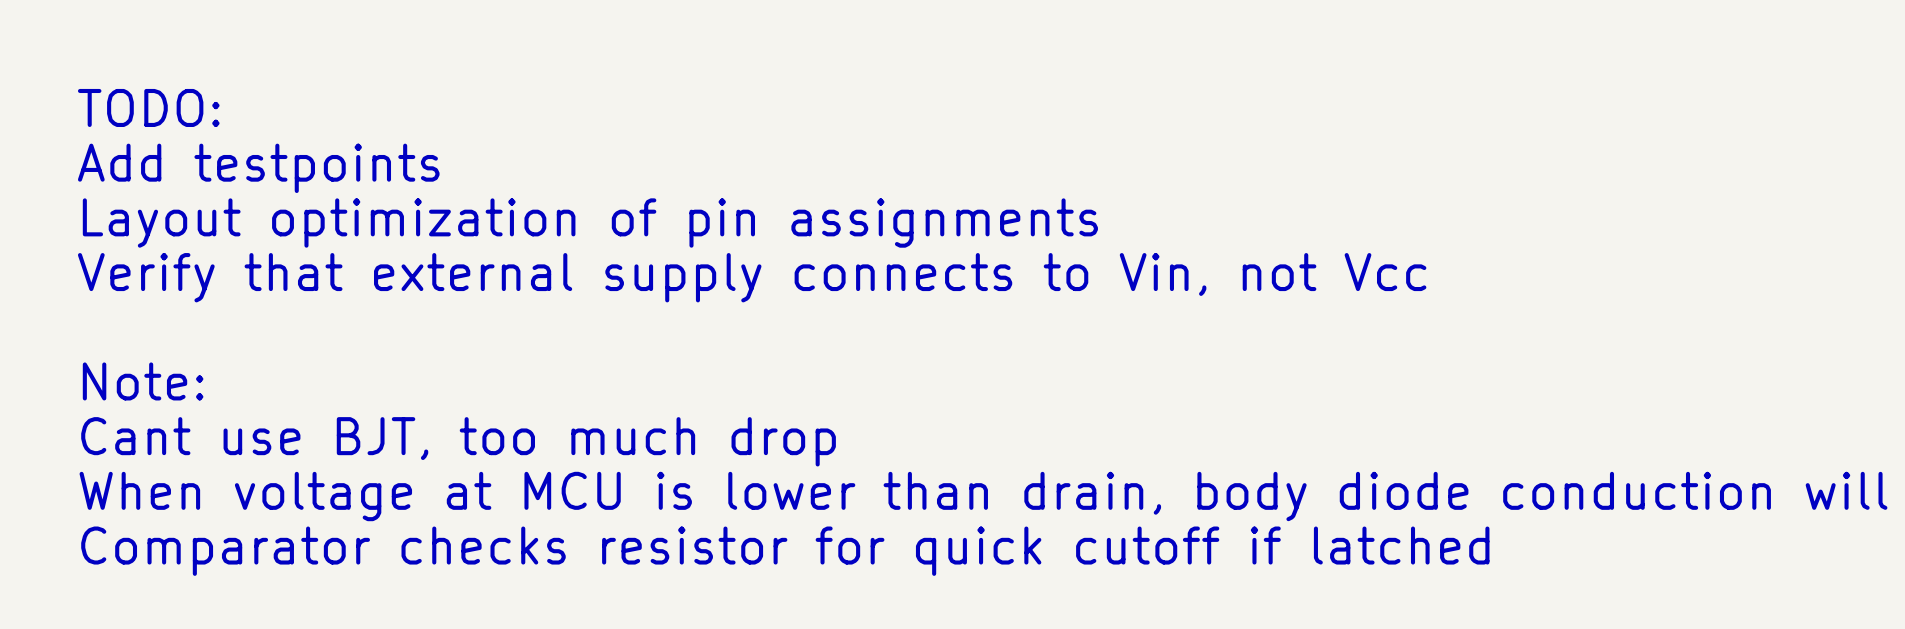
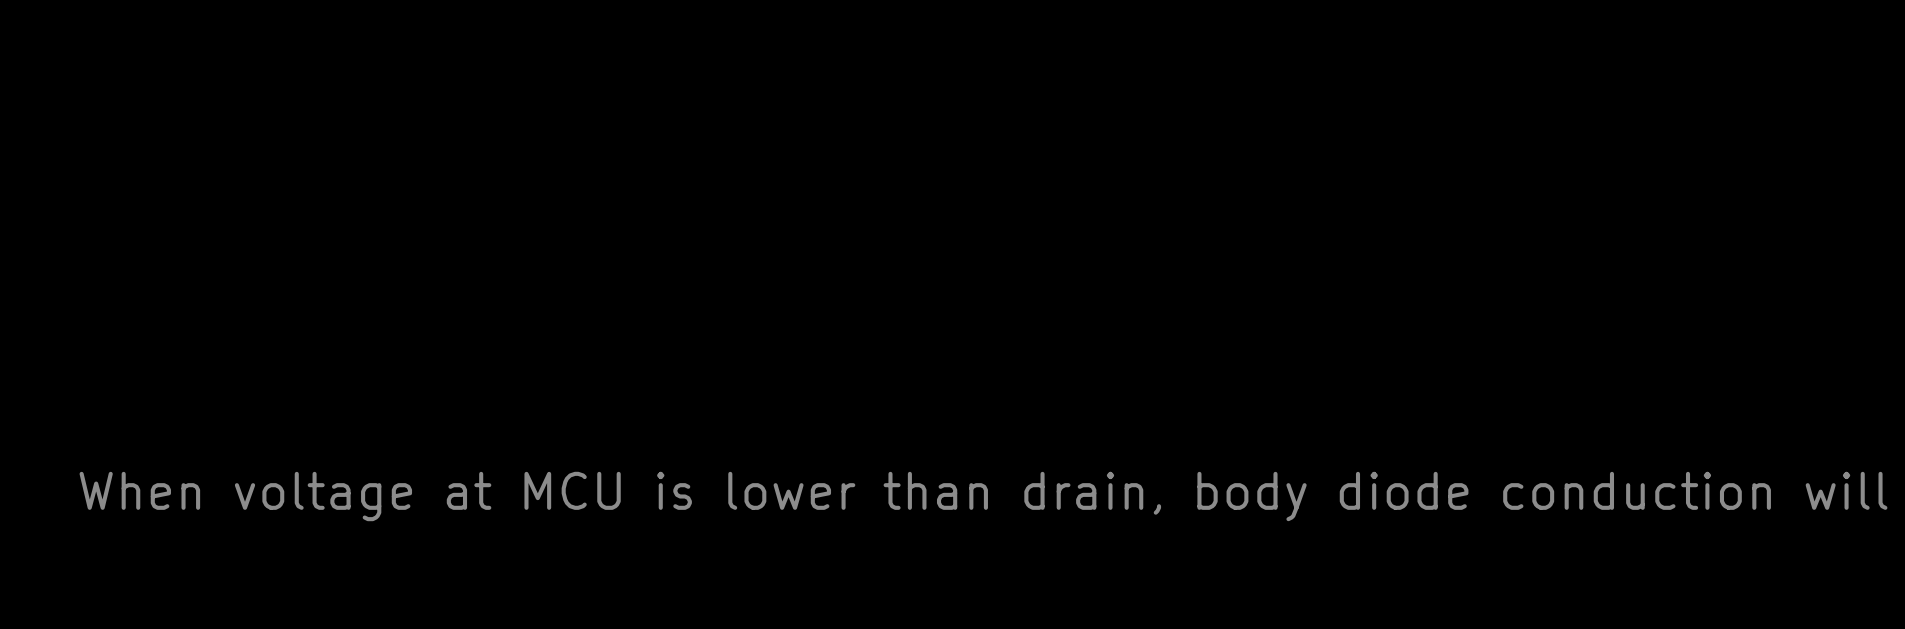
text: TODO: (148, 107) -> none
text: Add testpoints (258, 168) -> none
text: Layout optimization of pin assignments (590, 223) -> none
text: Verify that external supply connects to Vin, not Vcc (752, 277) -> none
text: Note: (143, 381) -> none
text: Cant use BJT, too much drop (458, 441) -> none
text: Comparator checks resistor for quick cutoff if latched (785, 551) -> none

